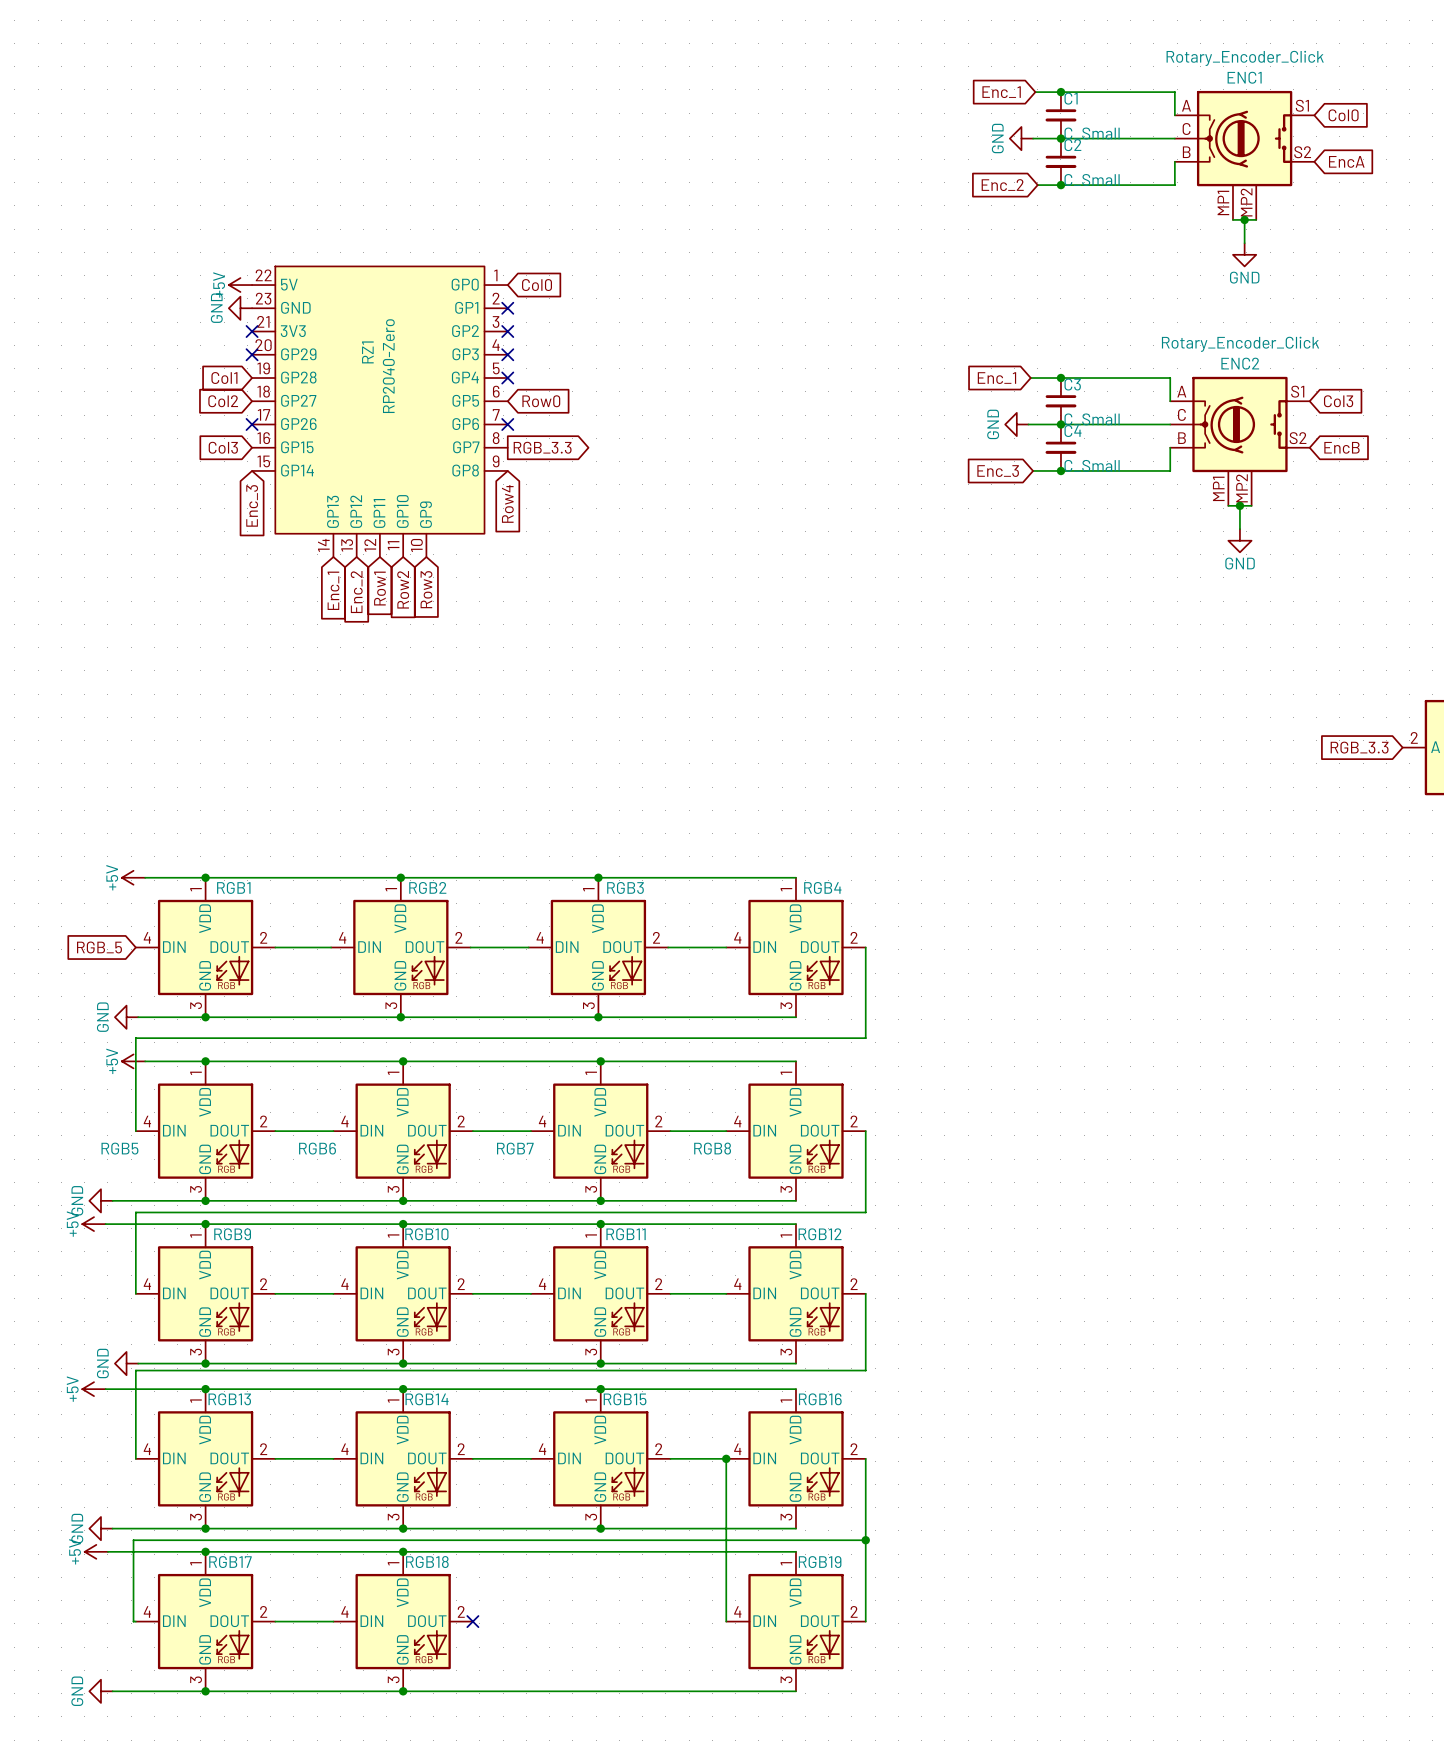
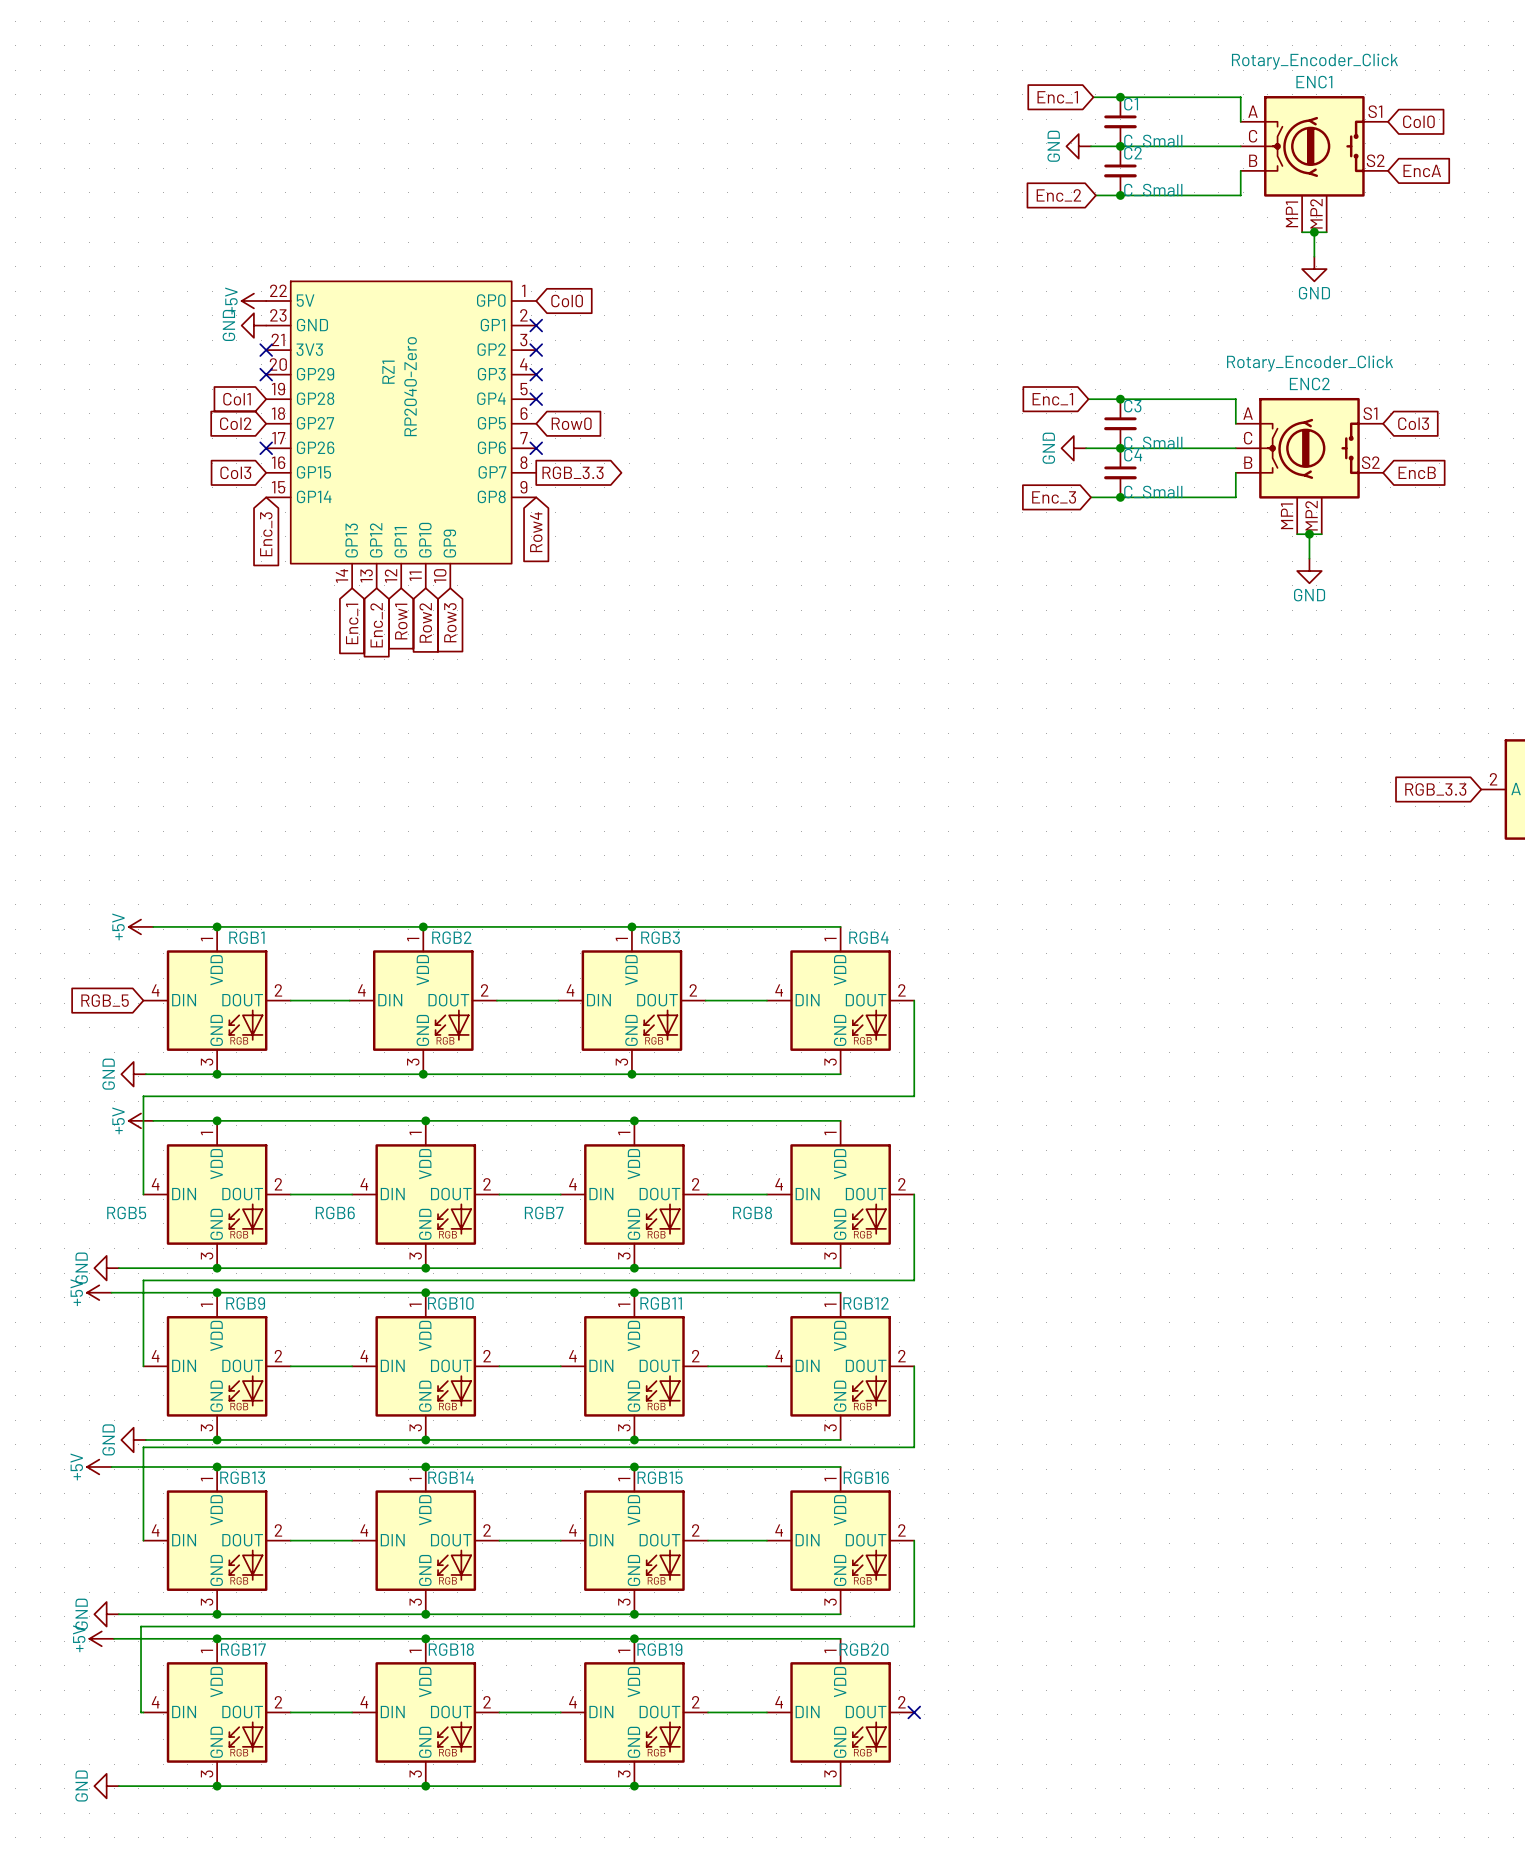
wire: (726, 1458) (726, 1621) -> (708, 1712) (766, 1712)
junction: (726, 1458) -> none
wire: (865, 1540) (865, 1621) -> none
junction: (865, 1540) -> none
junction: none -> (634, 1638)
RGB19 name: RGB19 (820, 1562) -> RGB20 (864, 1649)
wire: none -> (499, 1712) (560, 1712)
no-connect mark: (472, 1621) -> none
RGB19: none -> (634, 1712)
no-connect mark: none -> (914, 1712)
junction: none -> (634, 1786)

